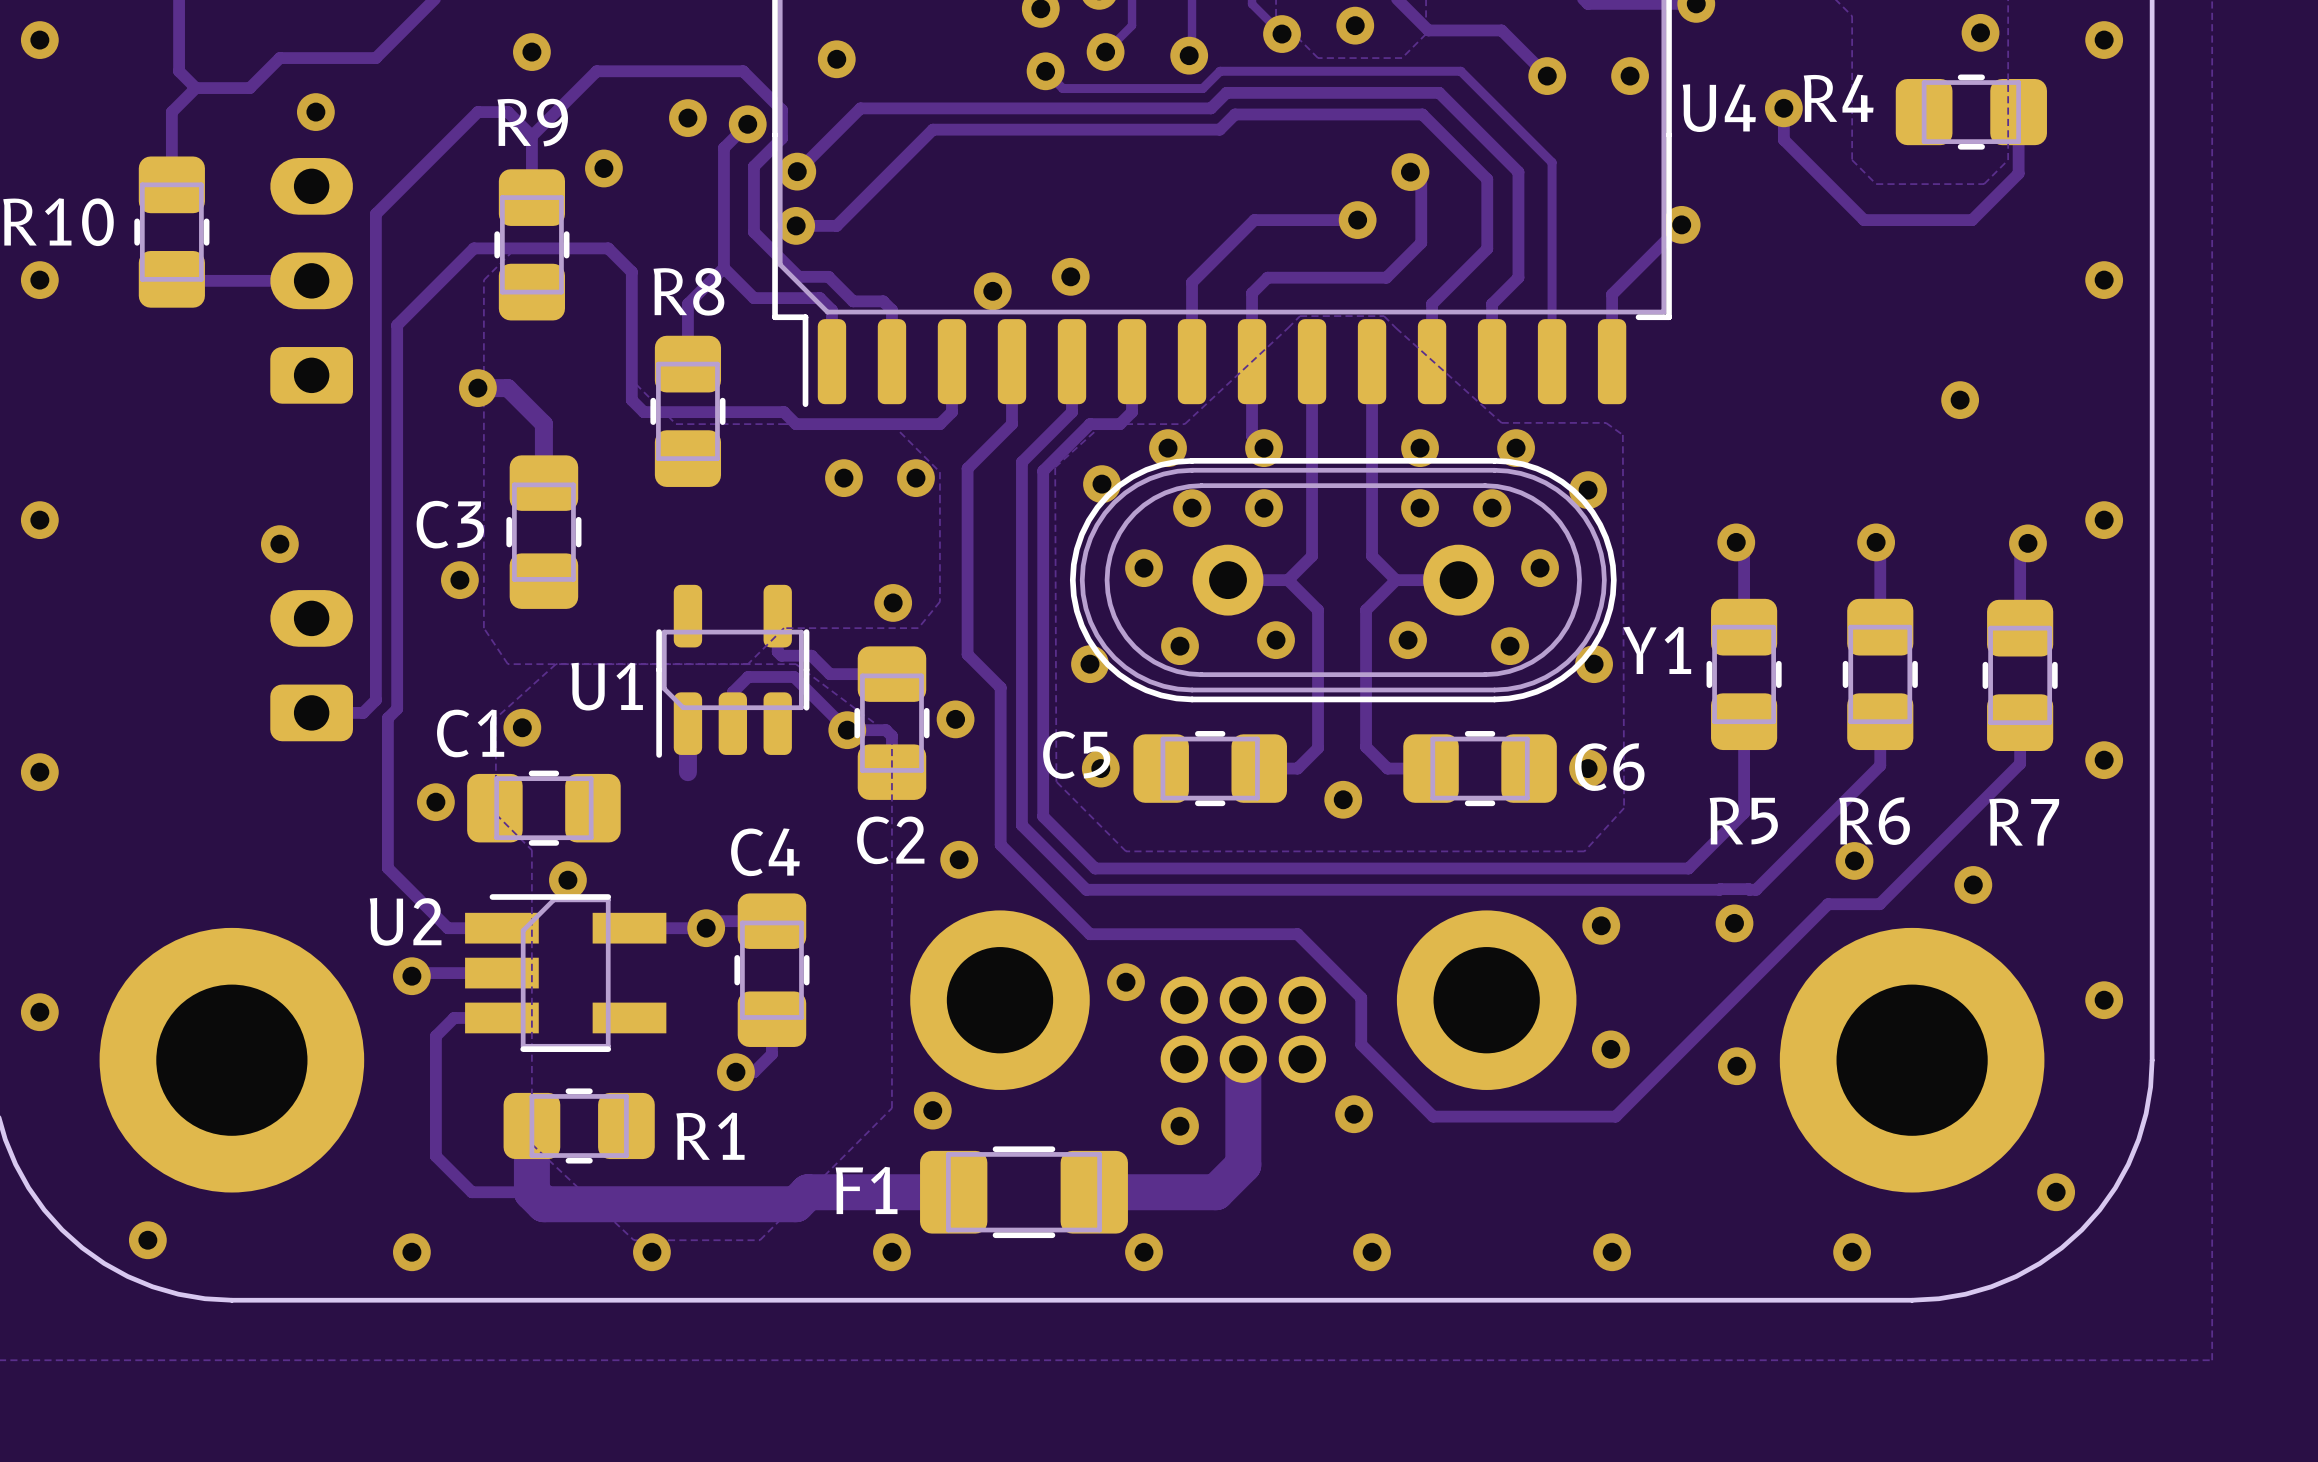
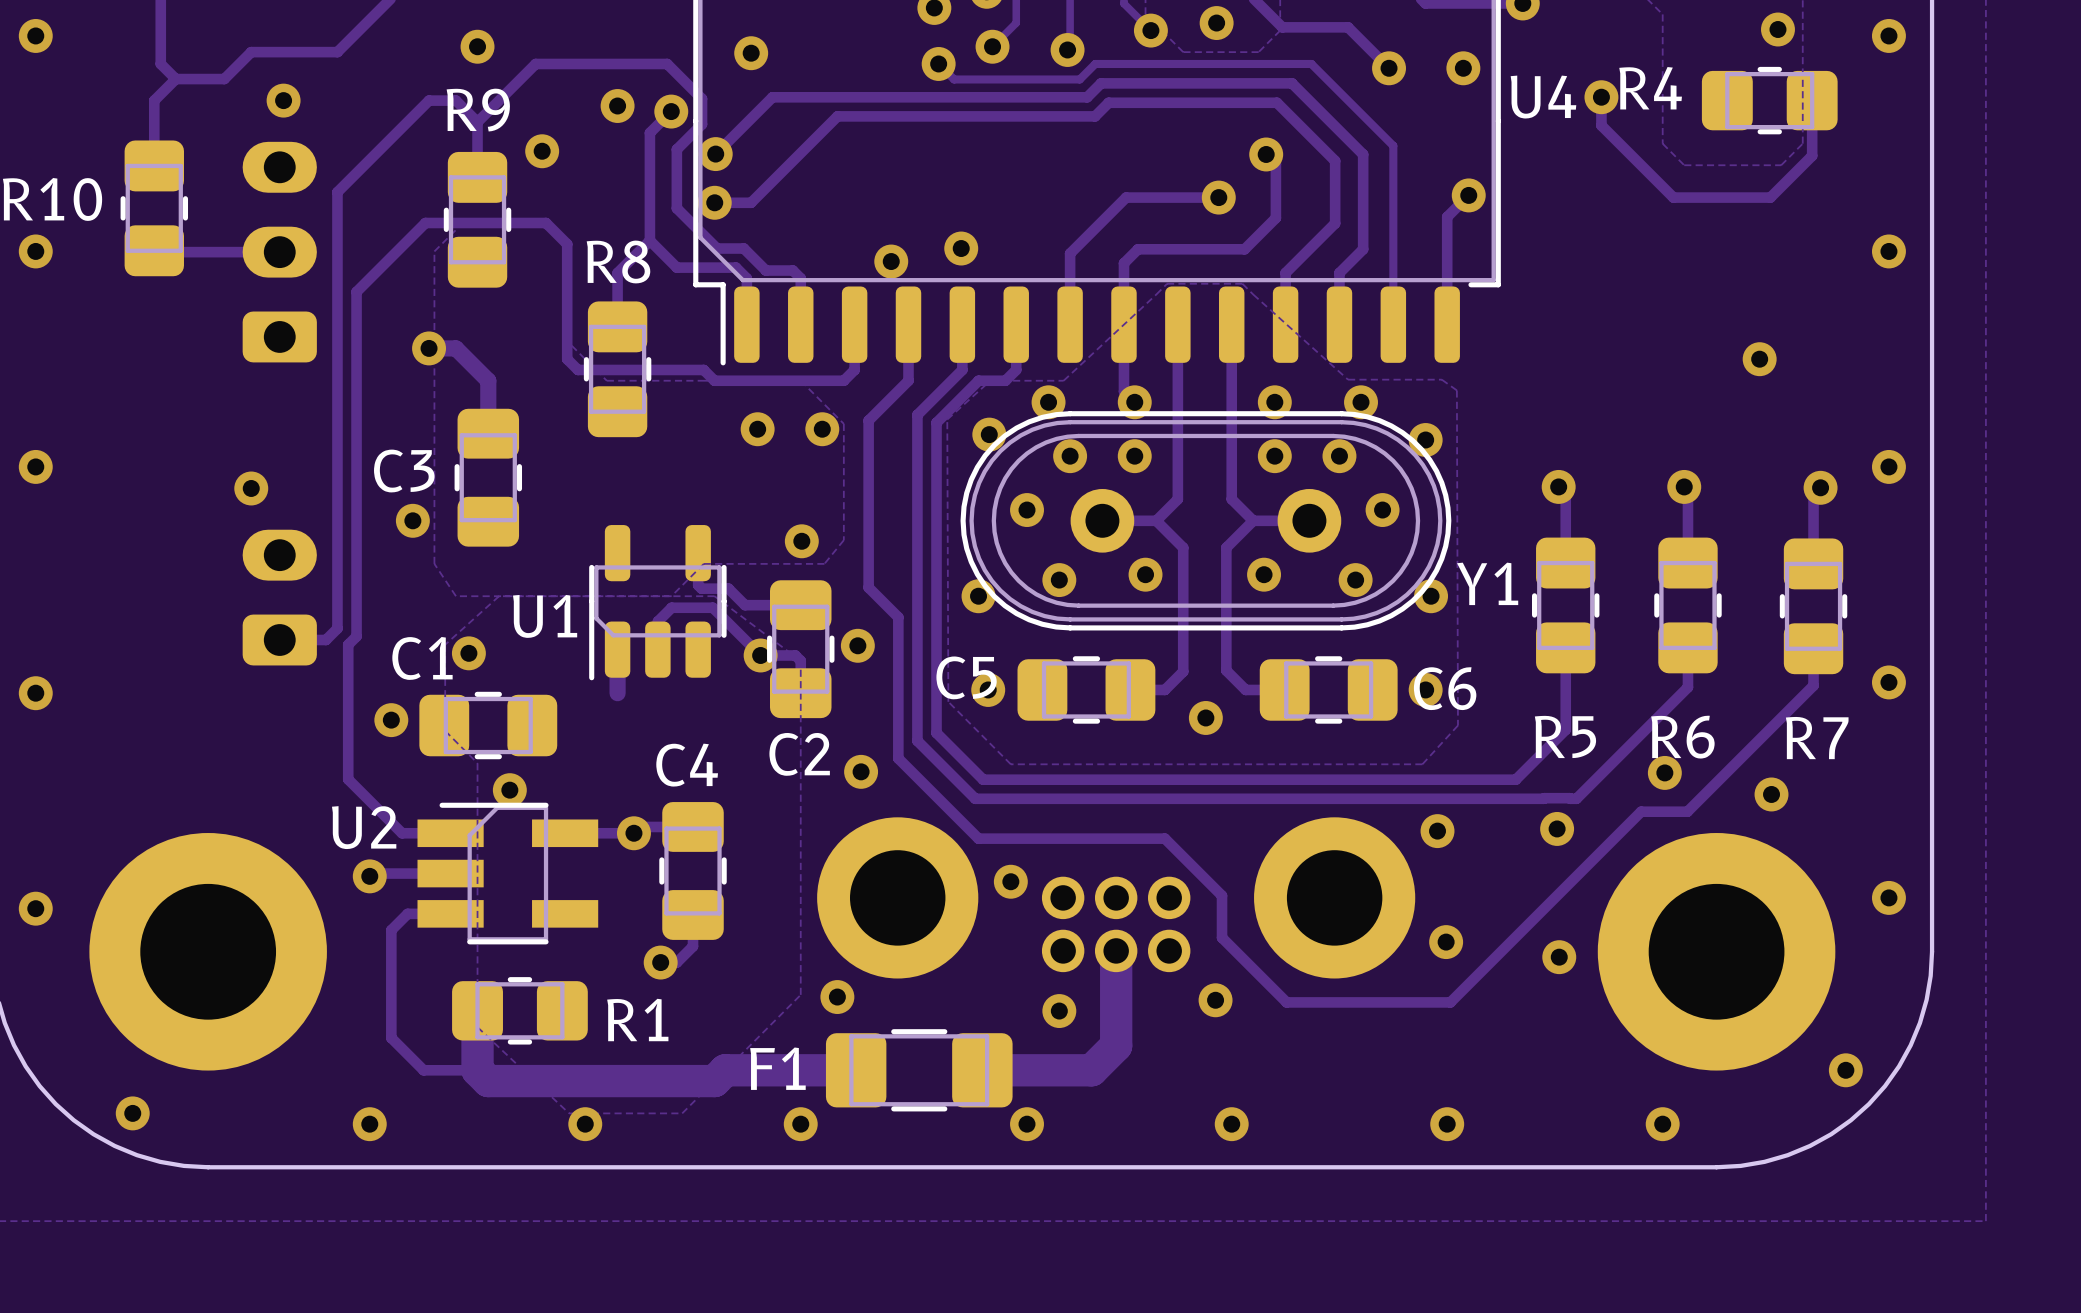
track: (1681, 224) (1612, 294) -> (1468, 195) (1447, 216) (1447, 264)
via position: (1681, 224) -> (1468, 195)

